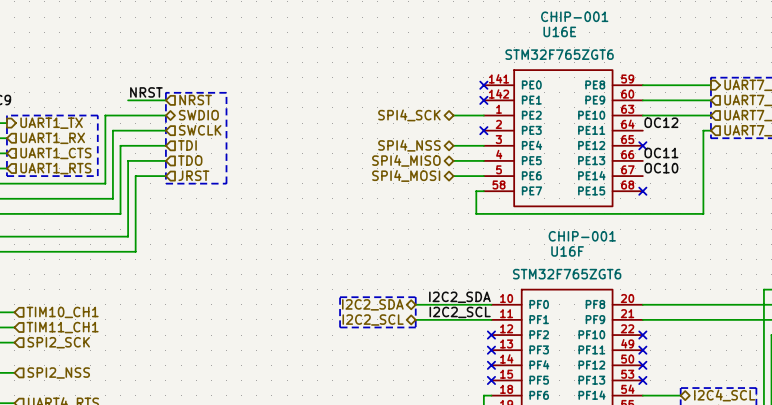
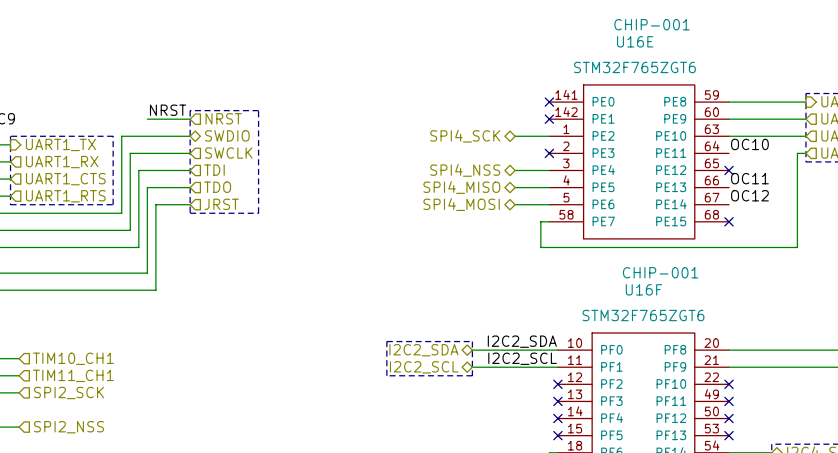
label: OC12 (661, 122) -> OC10 (749, 144)
label: OC10 (661, 168) -> OC12 (749, 195)

